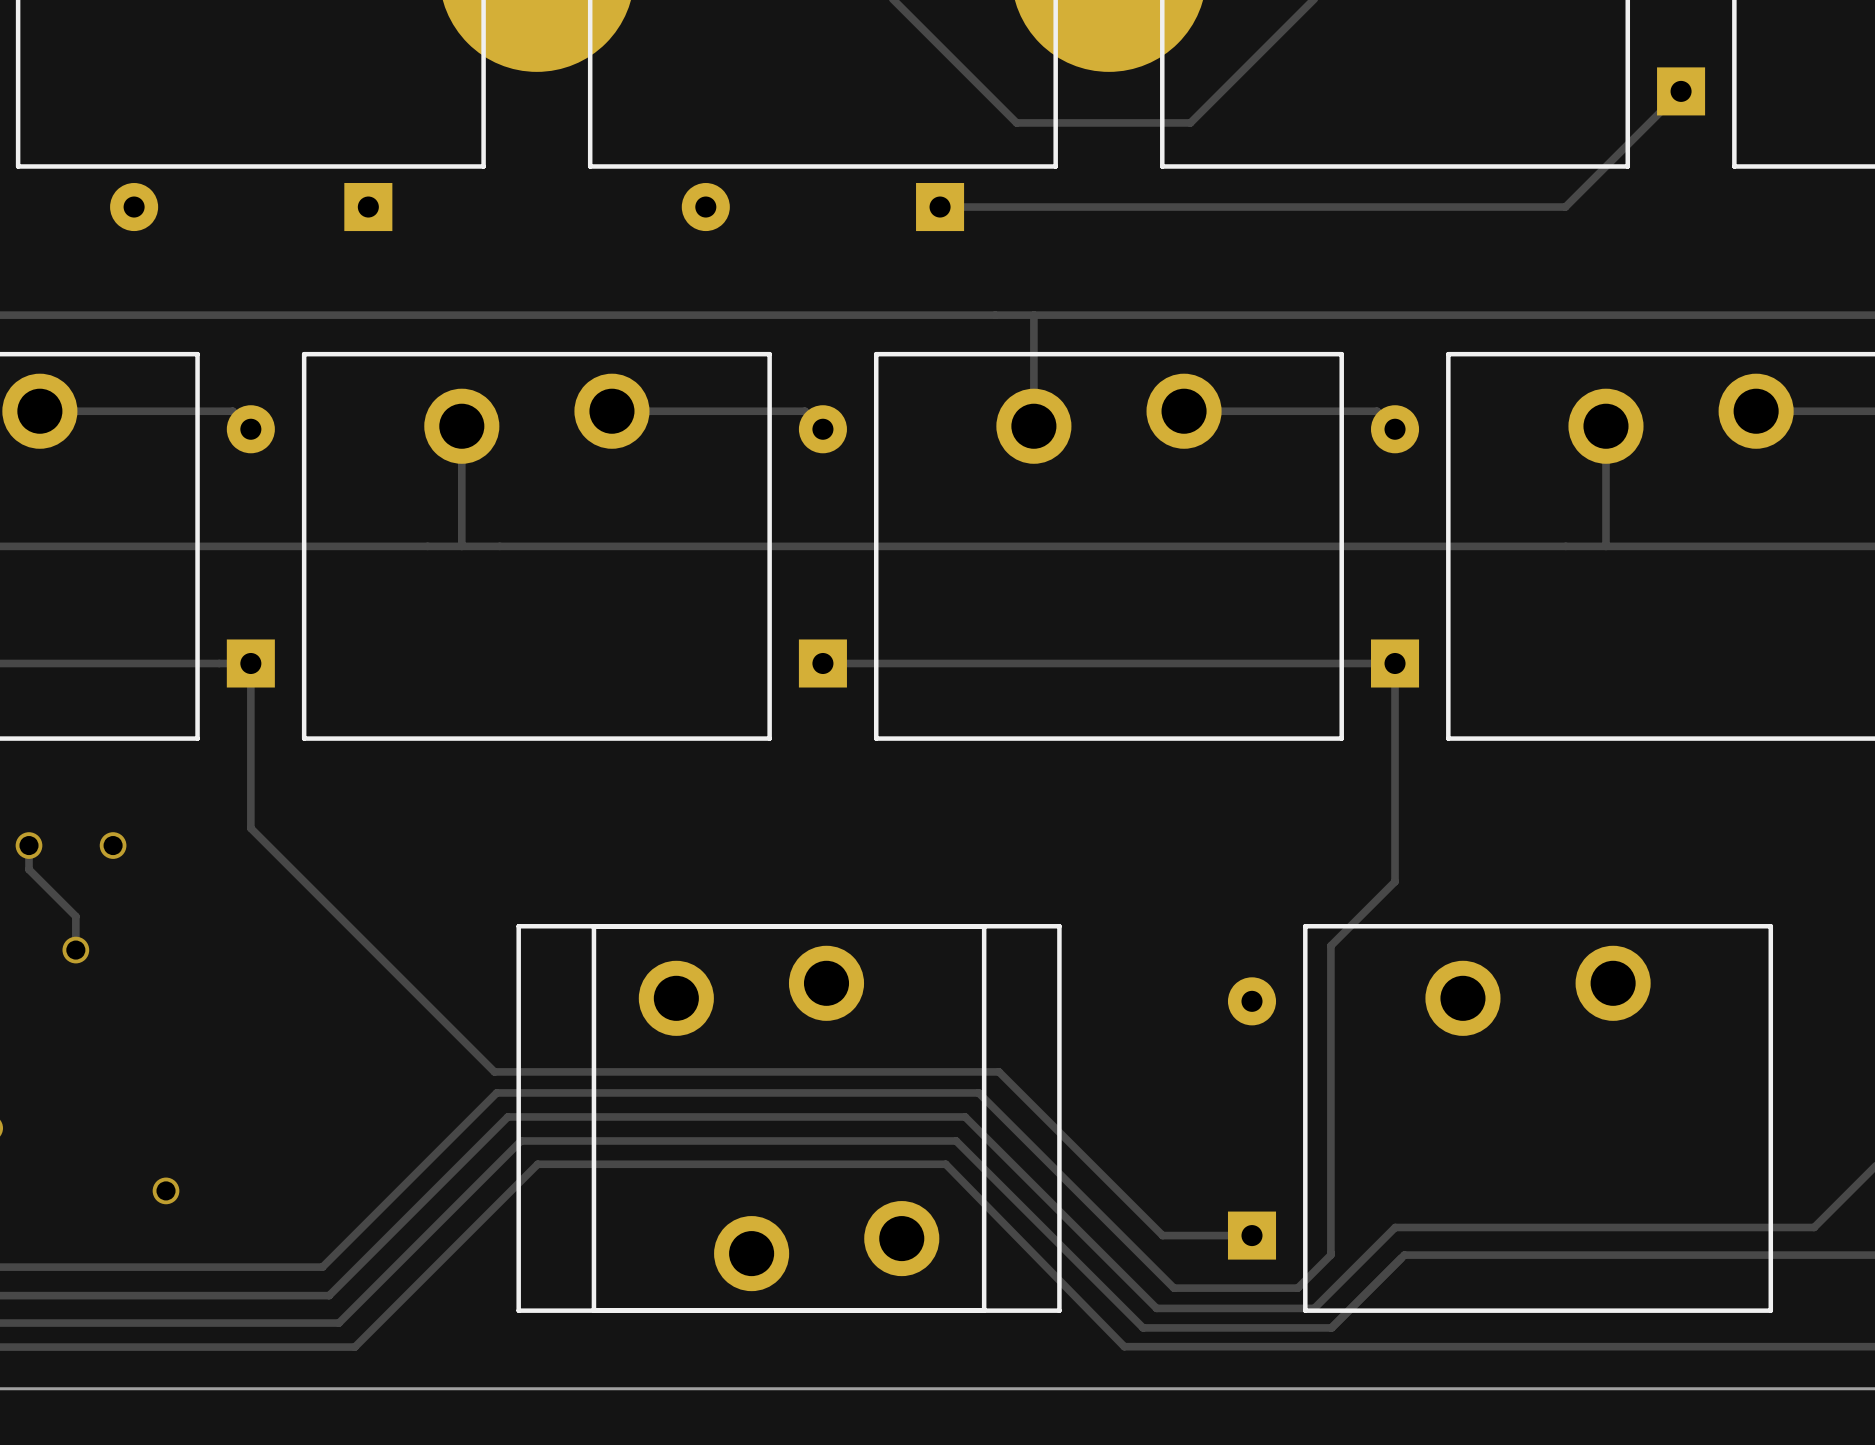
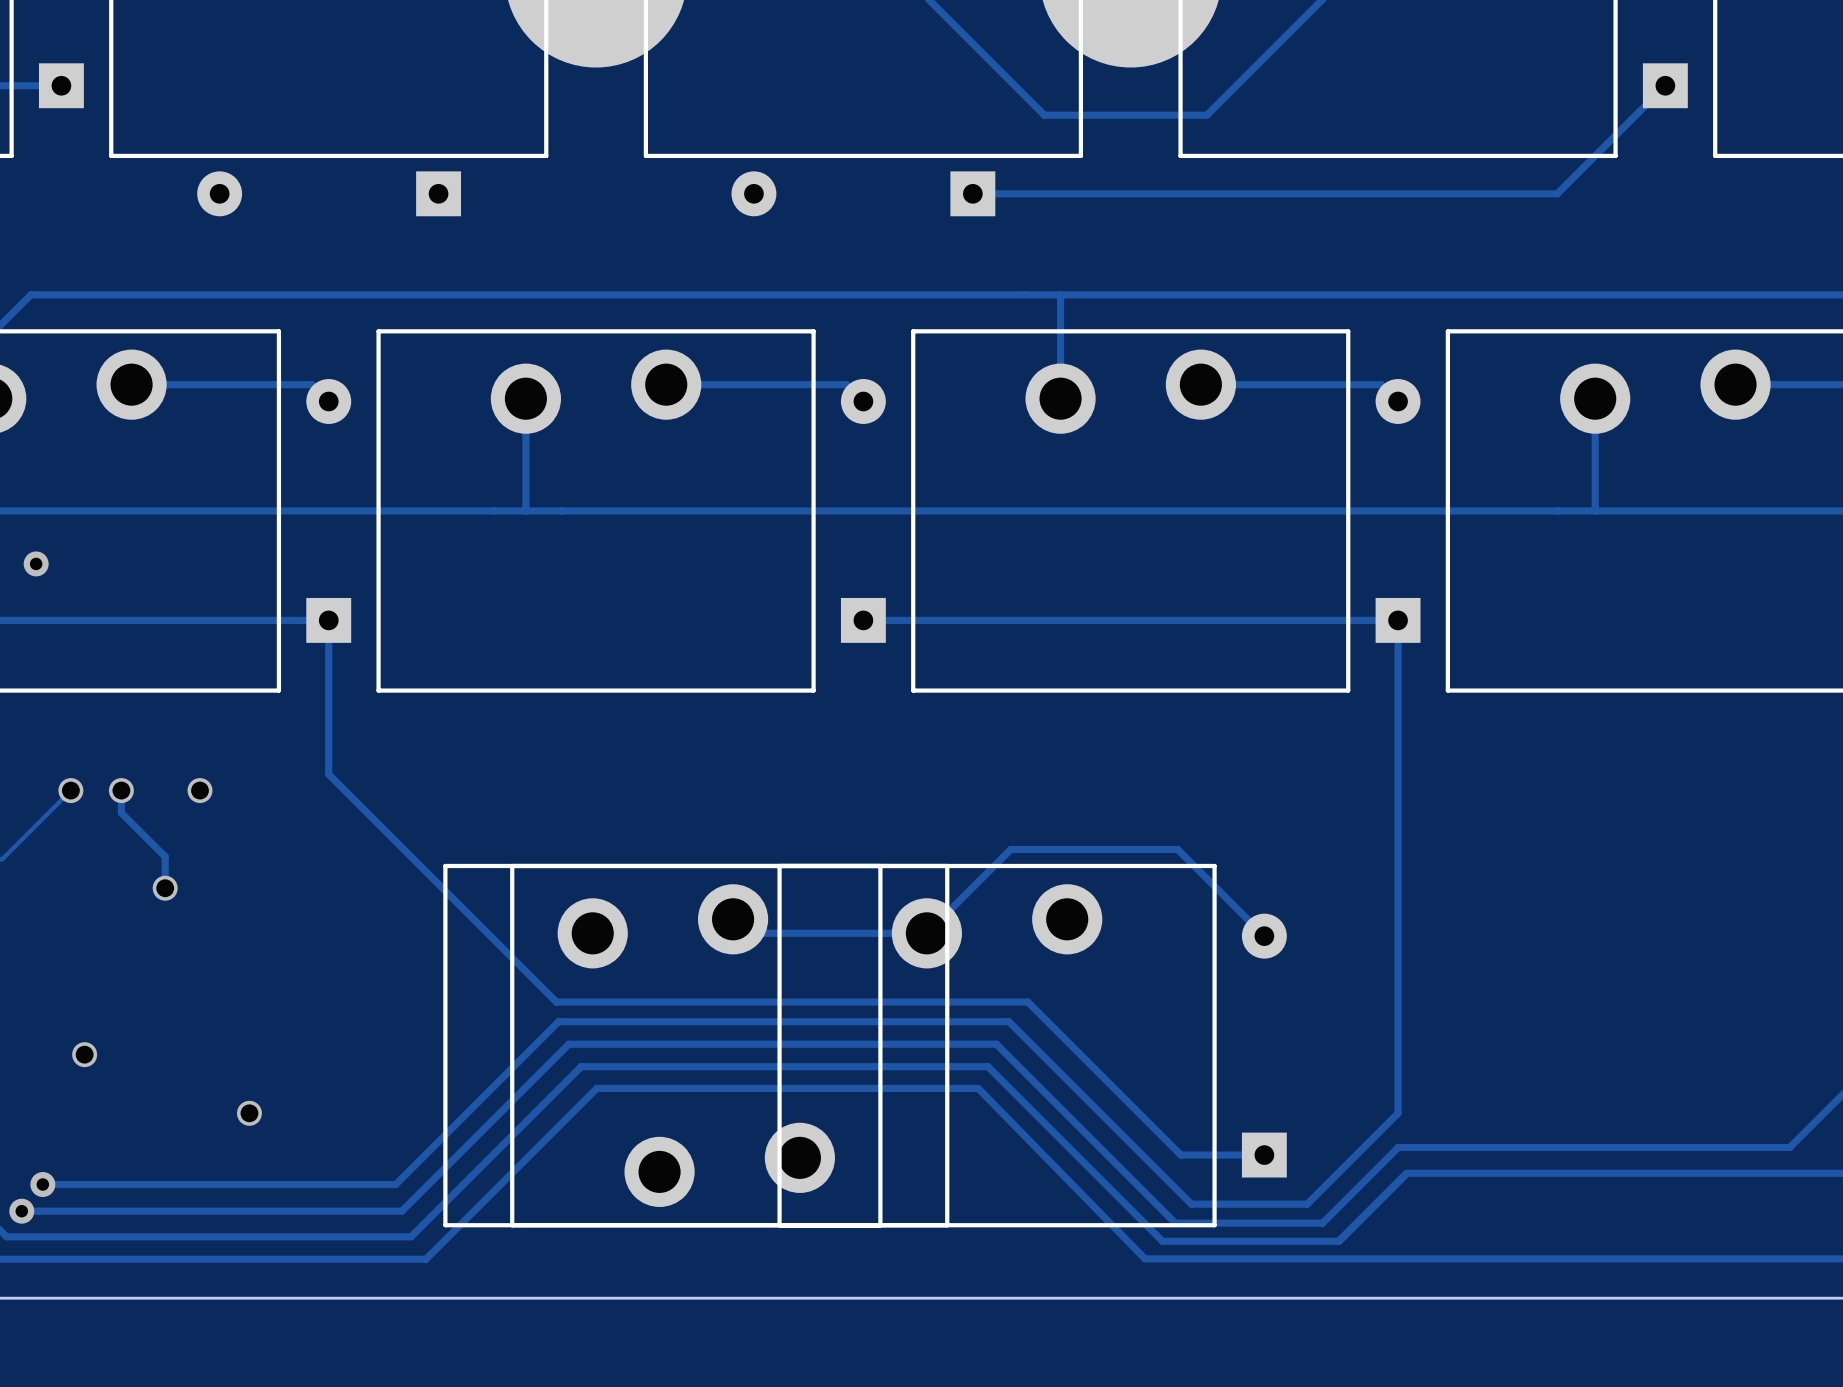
track: (1395, 881) (1330, 945) (1330, 1255) -> (1398, 824) (1398, 1113) (1338, 1173)
track: none -> (733, 919) (747, 933) (926, 933) (1010, 849) (1177, 849) (1264, 936)
part: none -> (662, 1045)
part: none -> (729, 1045)
part: (751, 1118) -> none
part: (826, 1118) -> none
part: none -> (997, 1045)
part: (1538, 1118) -> none

